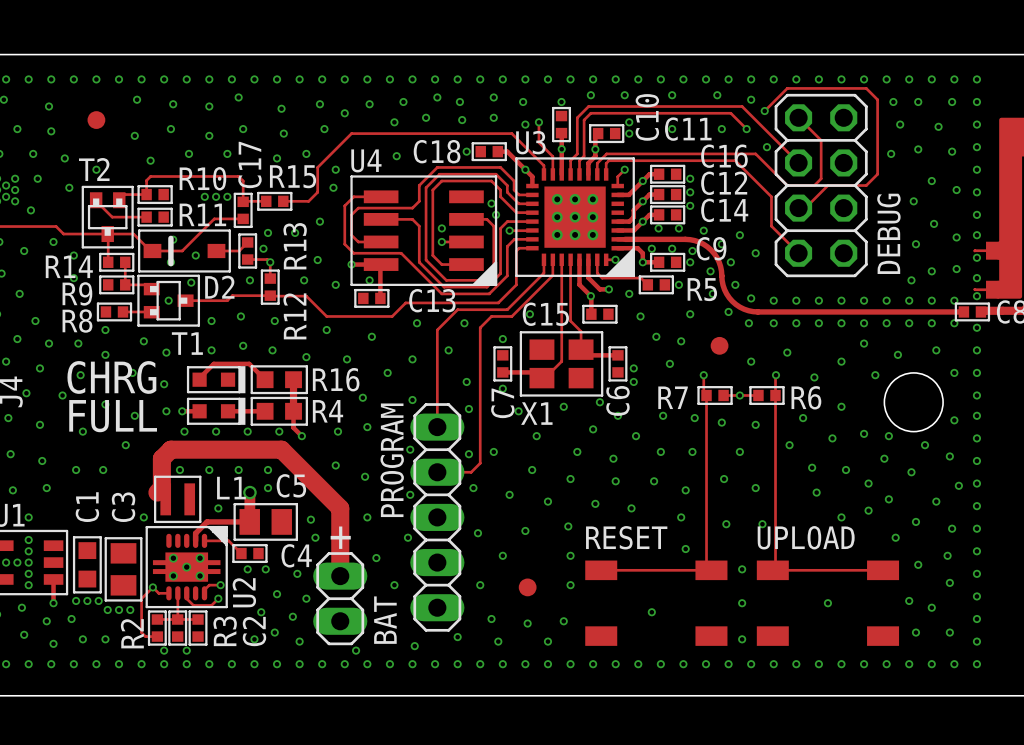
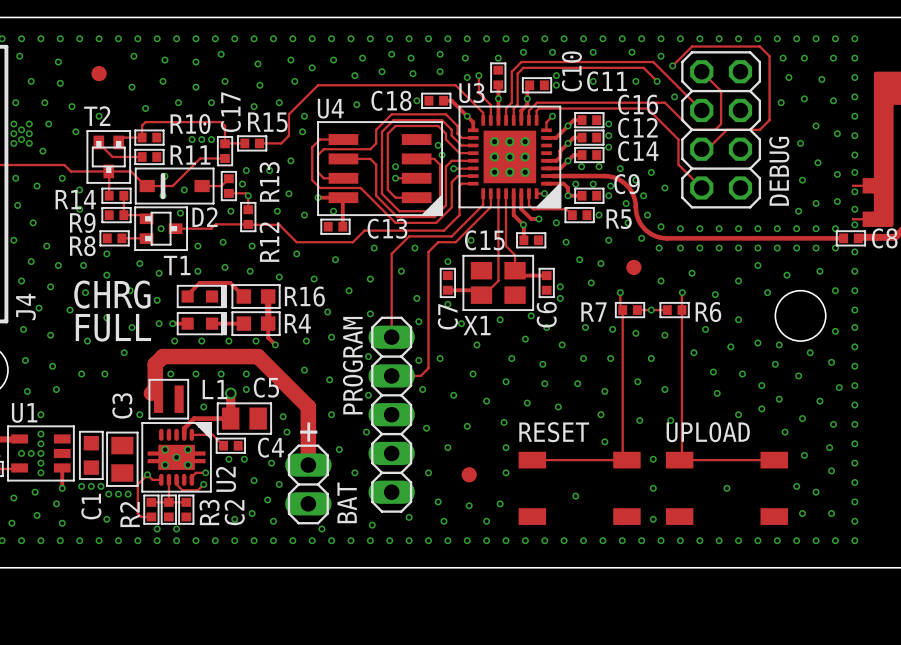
C1 name position: C1 (87, 507) -> C1 (91, 506)
via: (261, 612) -> none
via: (71, 619) -> none
via: (82, 639) -> none

